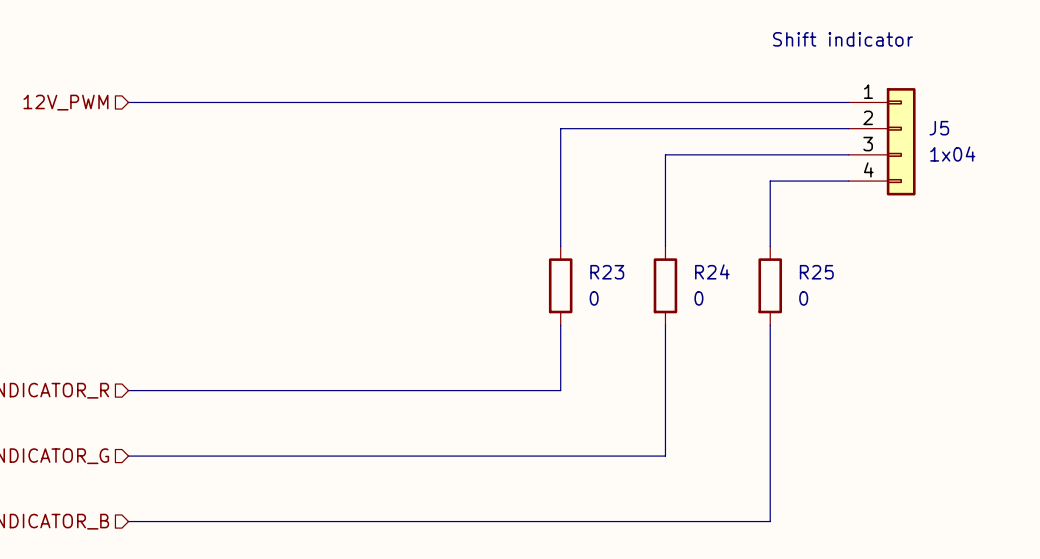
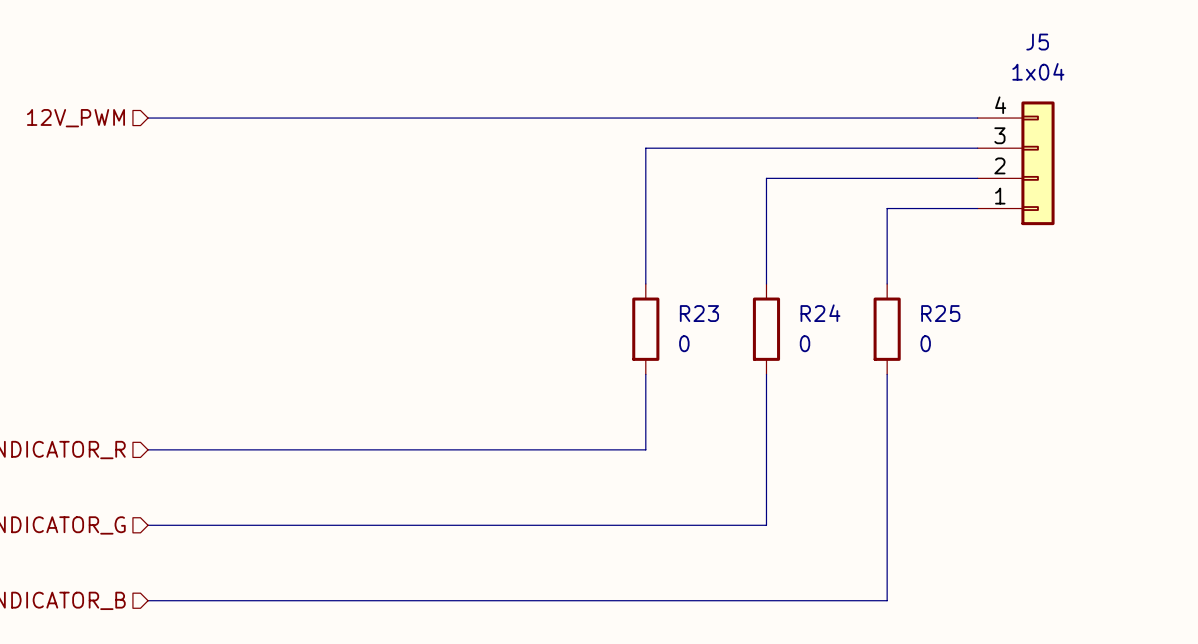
text: Shift indicator (842, 39) -> none
J5 name position: J5 (939, 128) -> J5 (1037, 42)
J5 flip: as is (901, 141) -> up-down (1037, 163)
J5 text position: 1x04 (952, 154) -> 1x04 (1038, 71)

